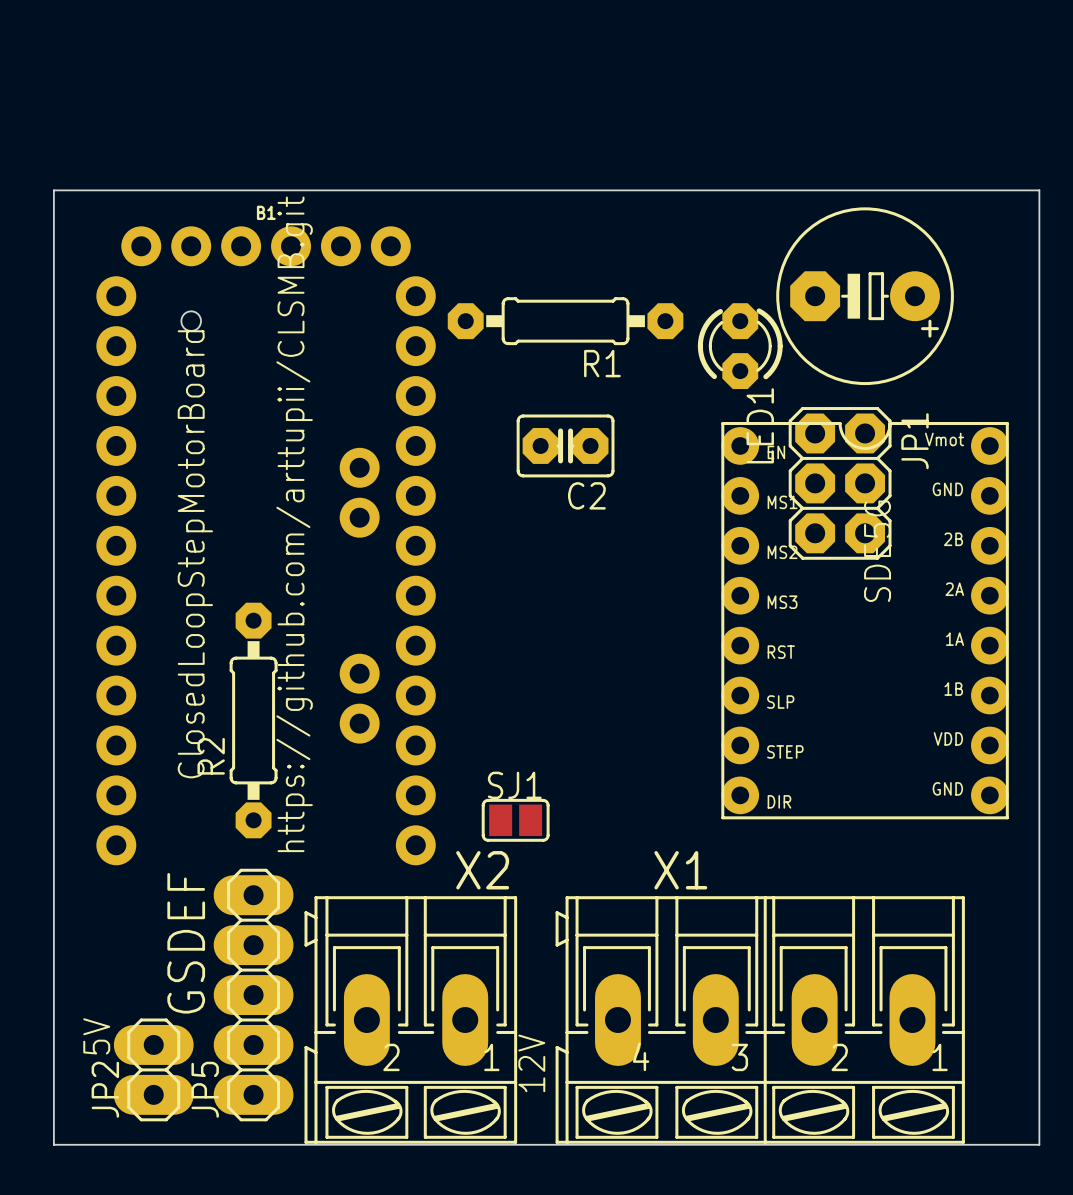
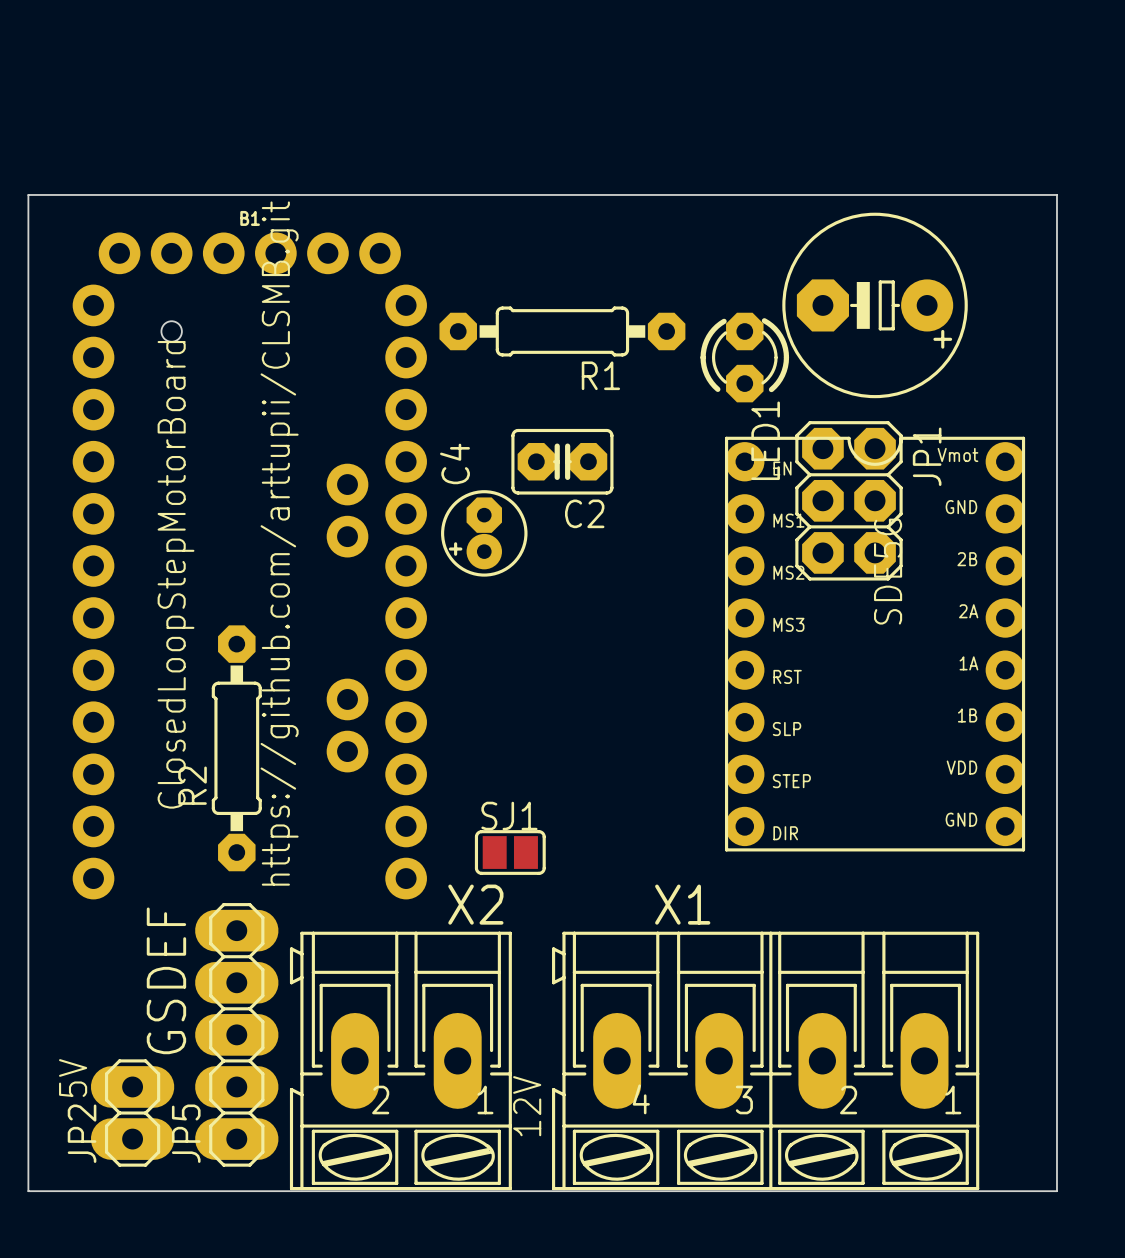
C4: none -> (484, 533)

